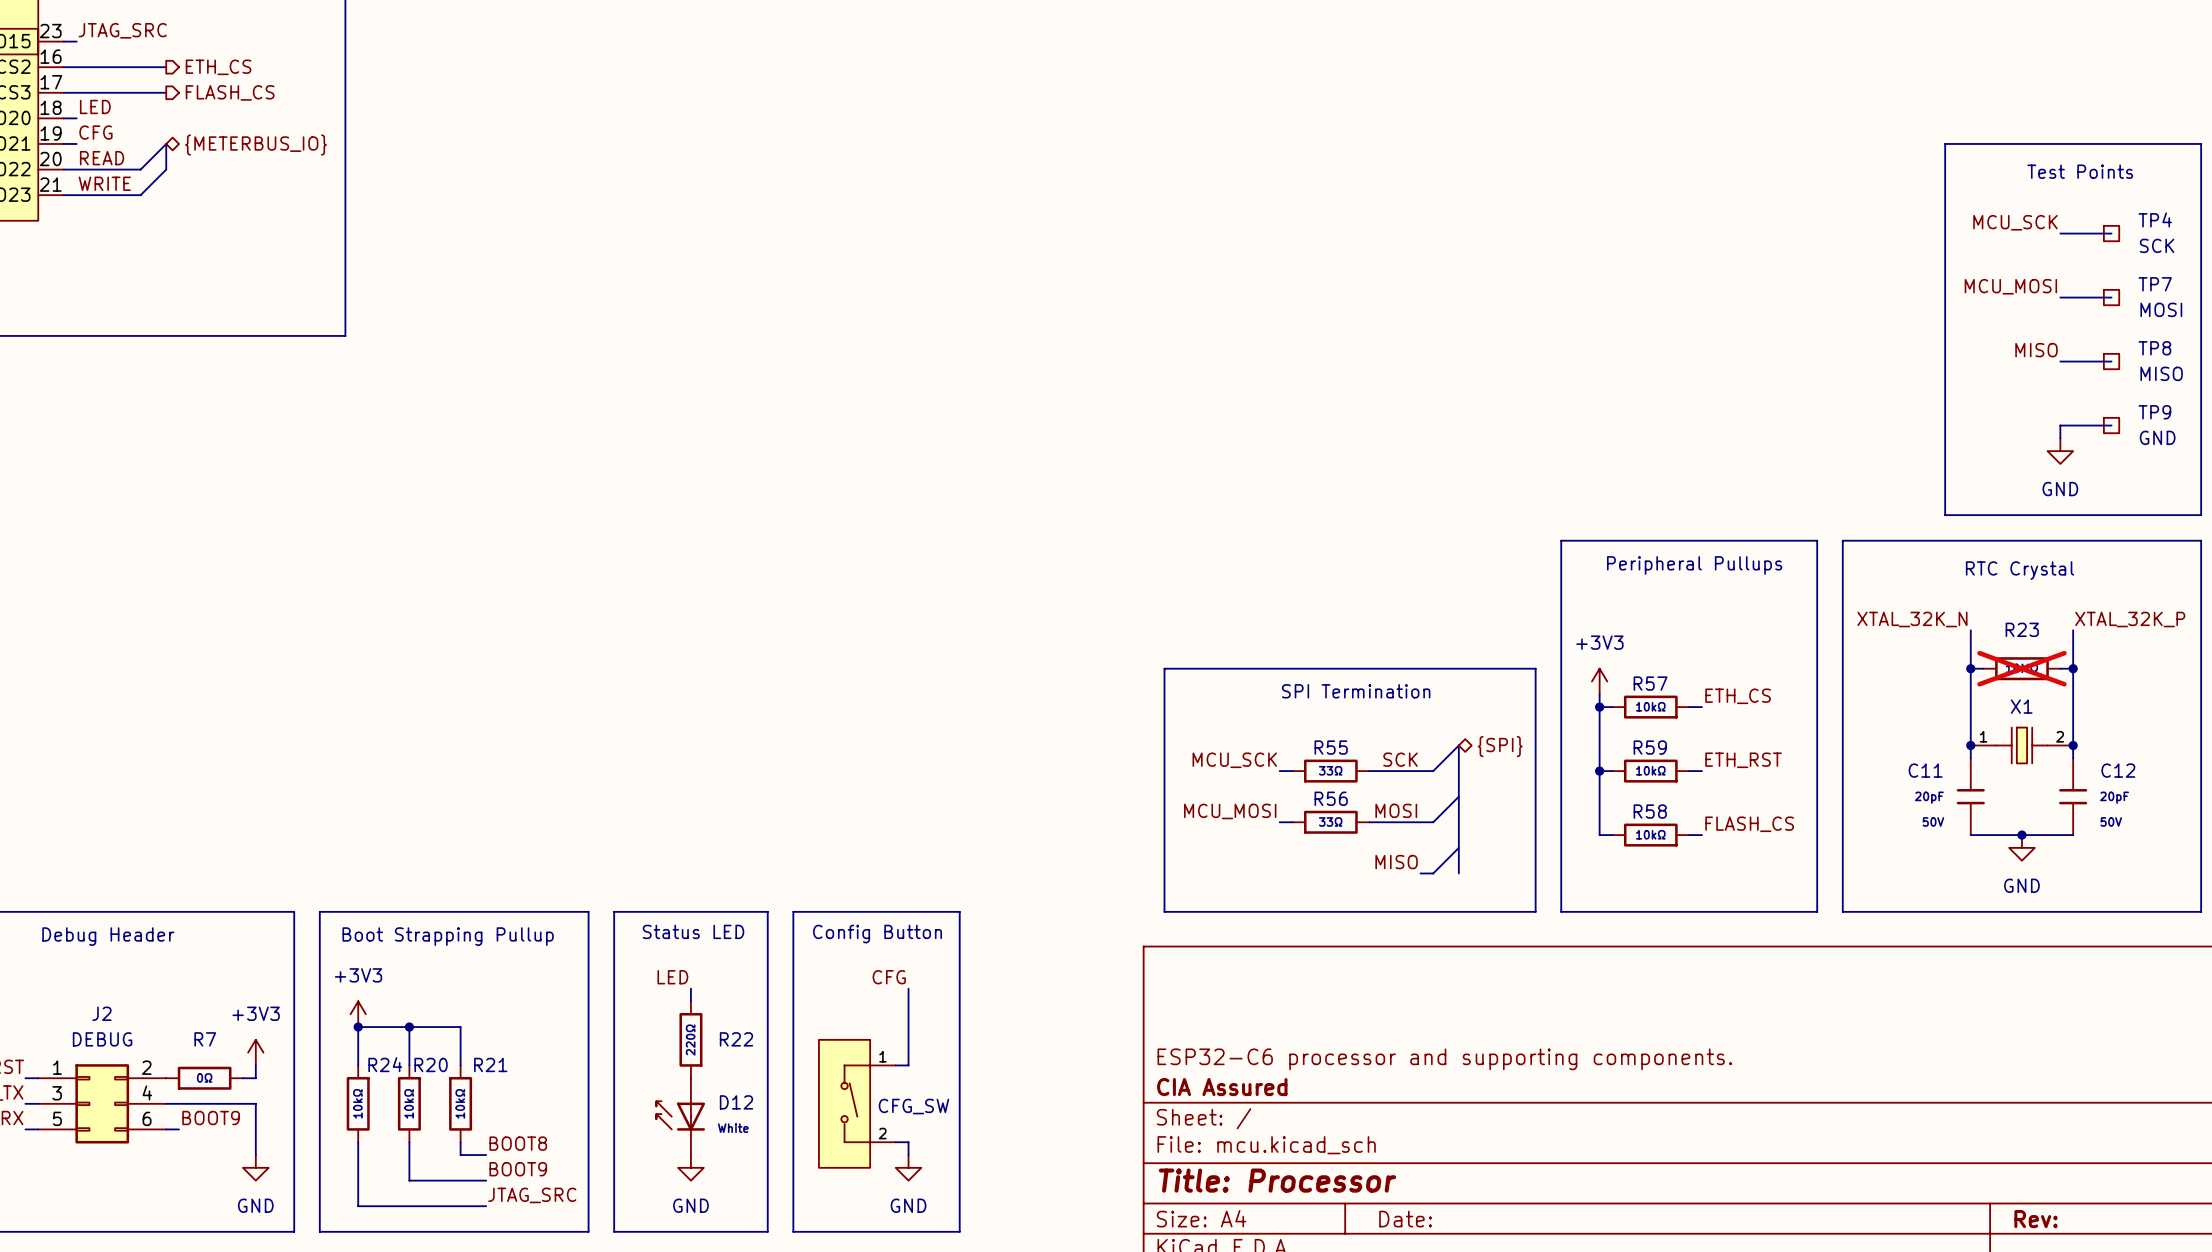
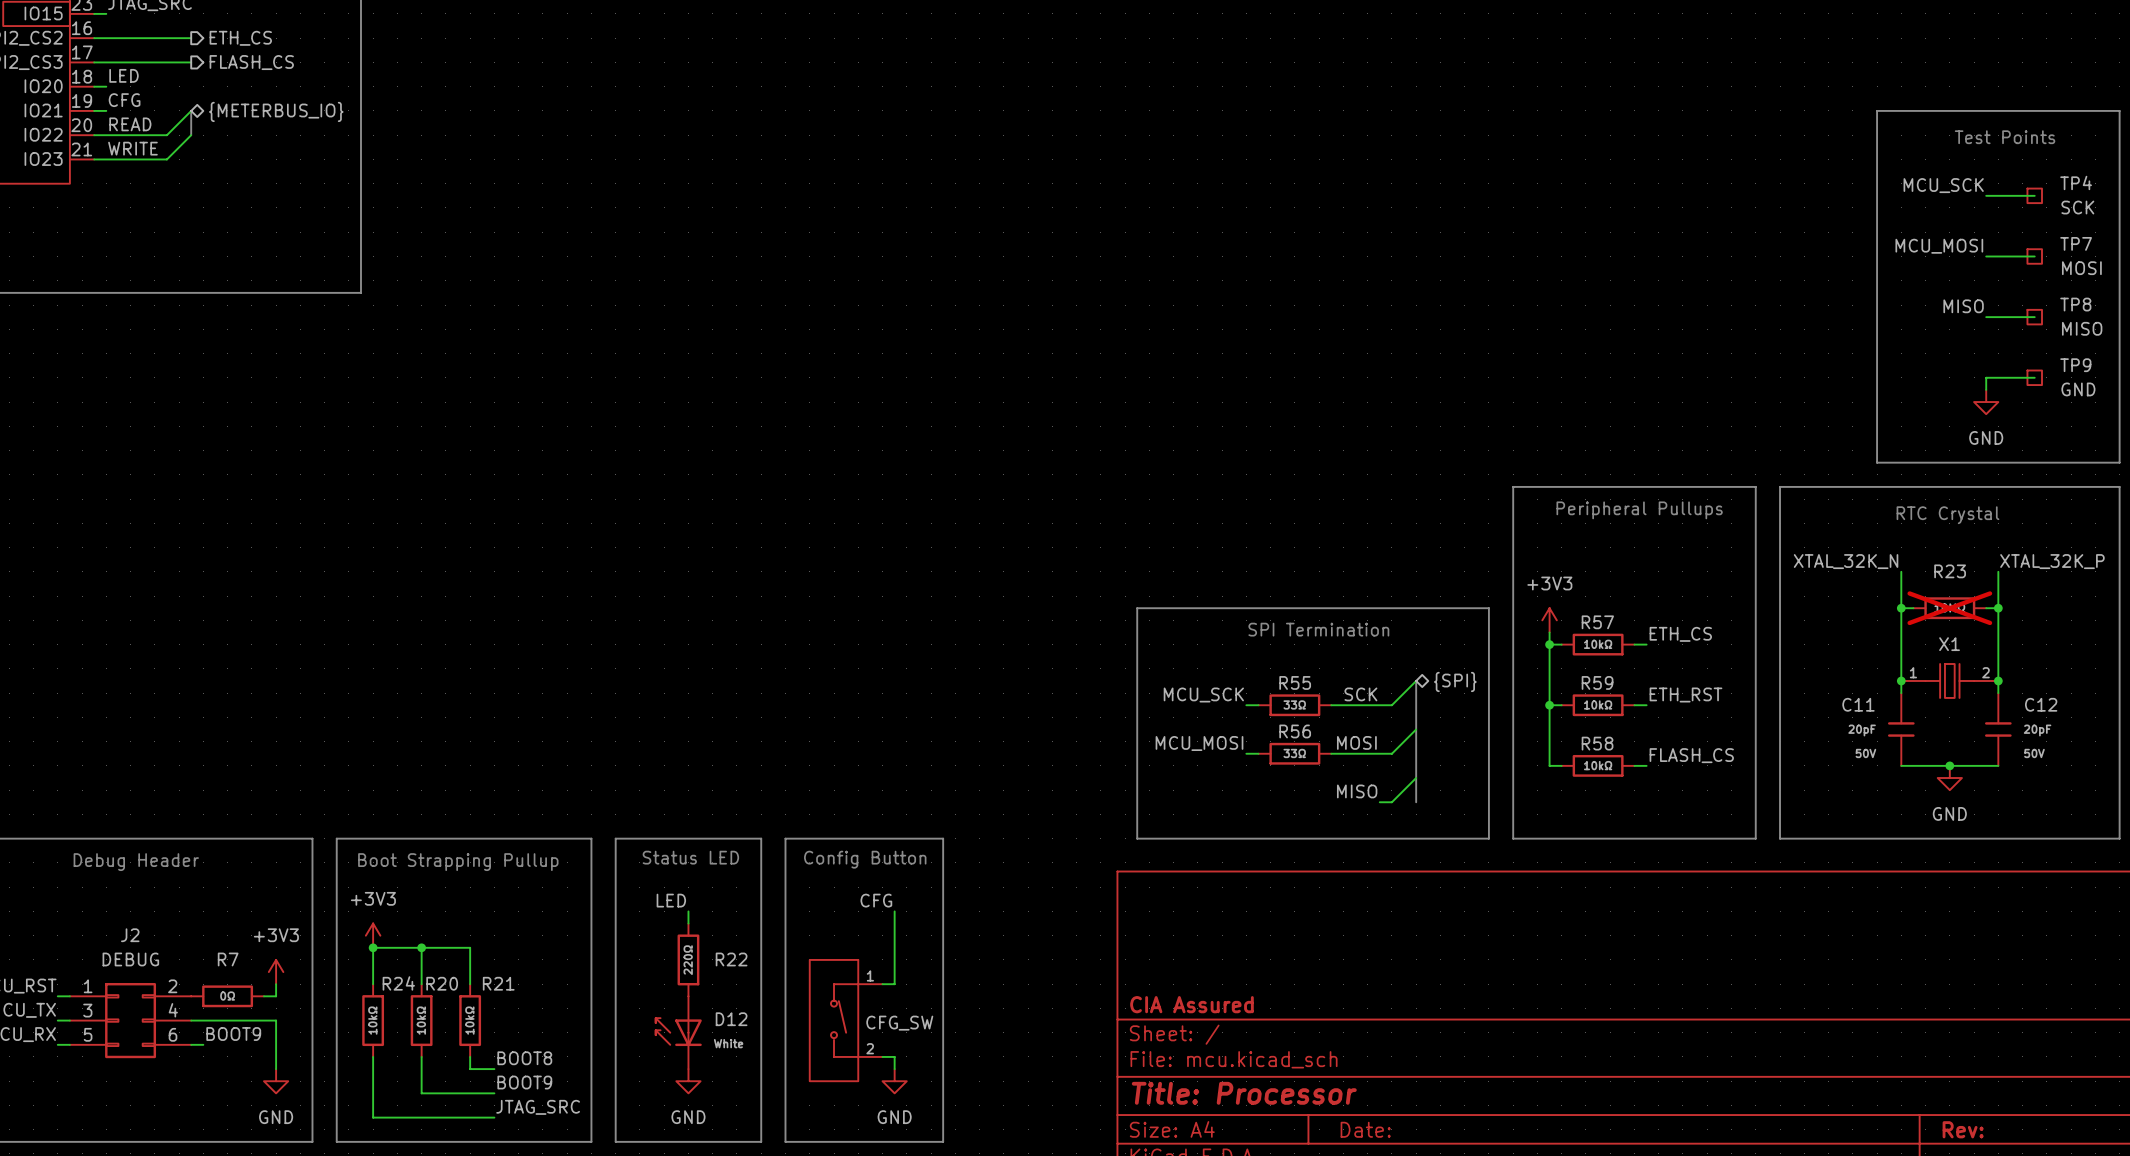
title block: ESP32-C6 processor and supporting components. (1444, 1059) -> none

